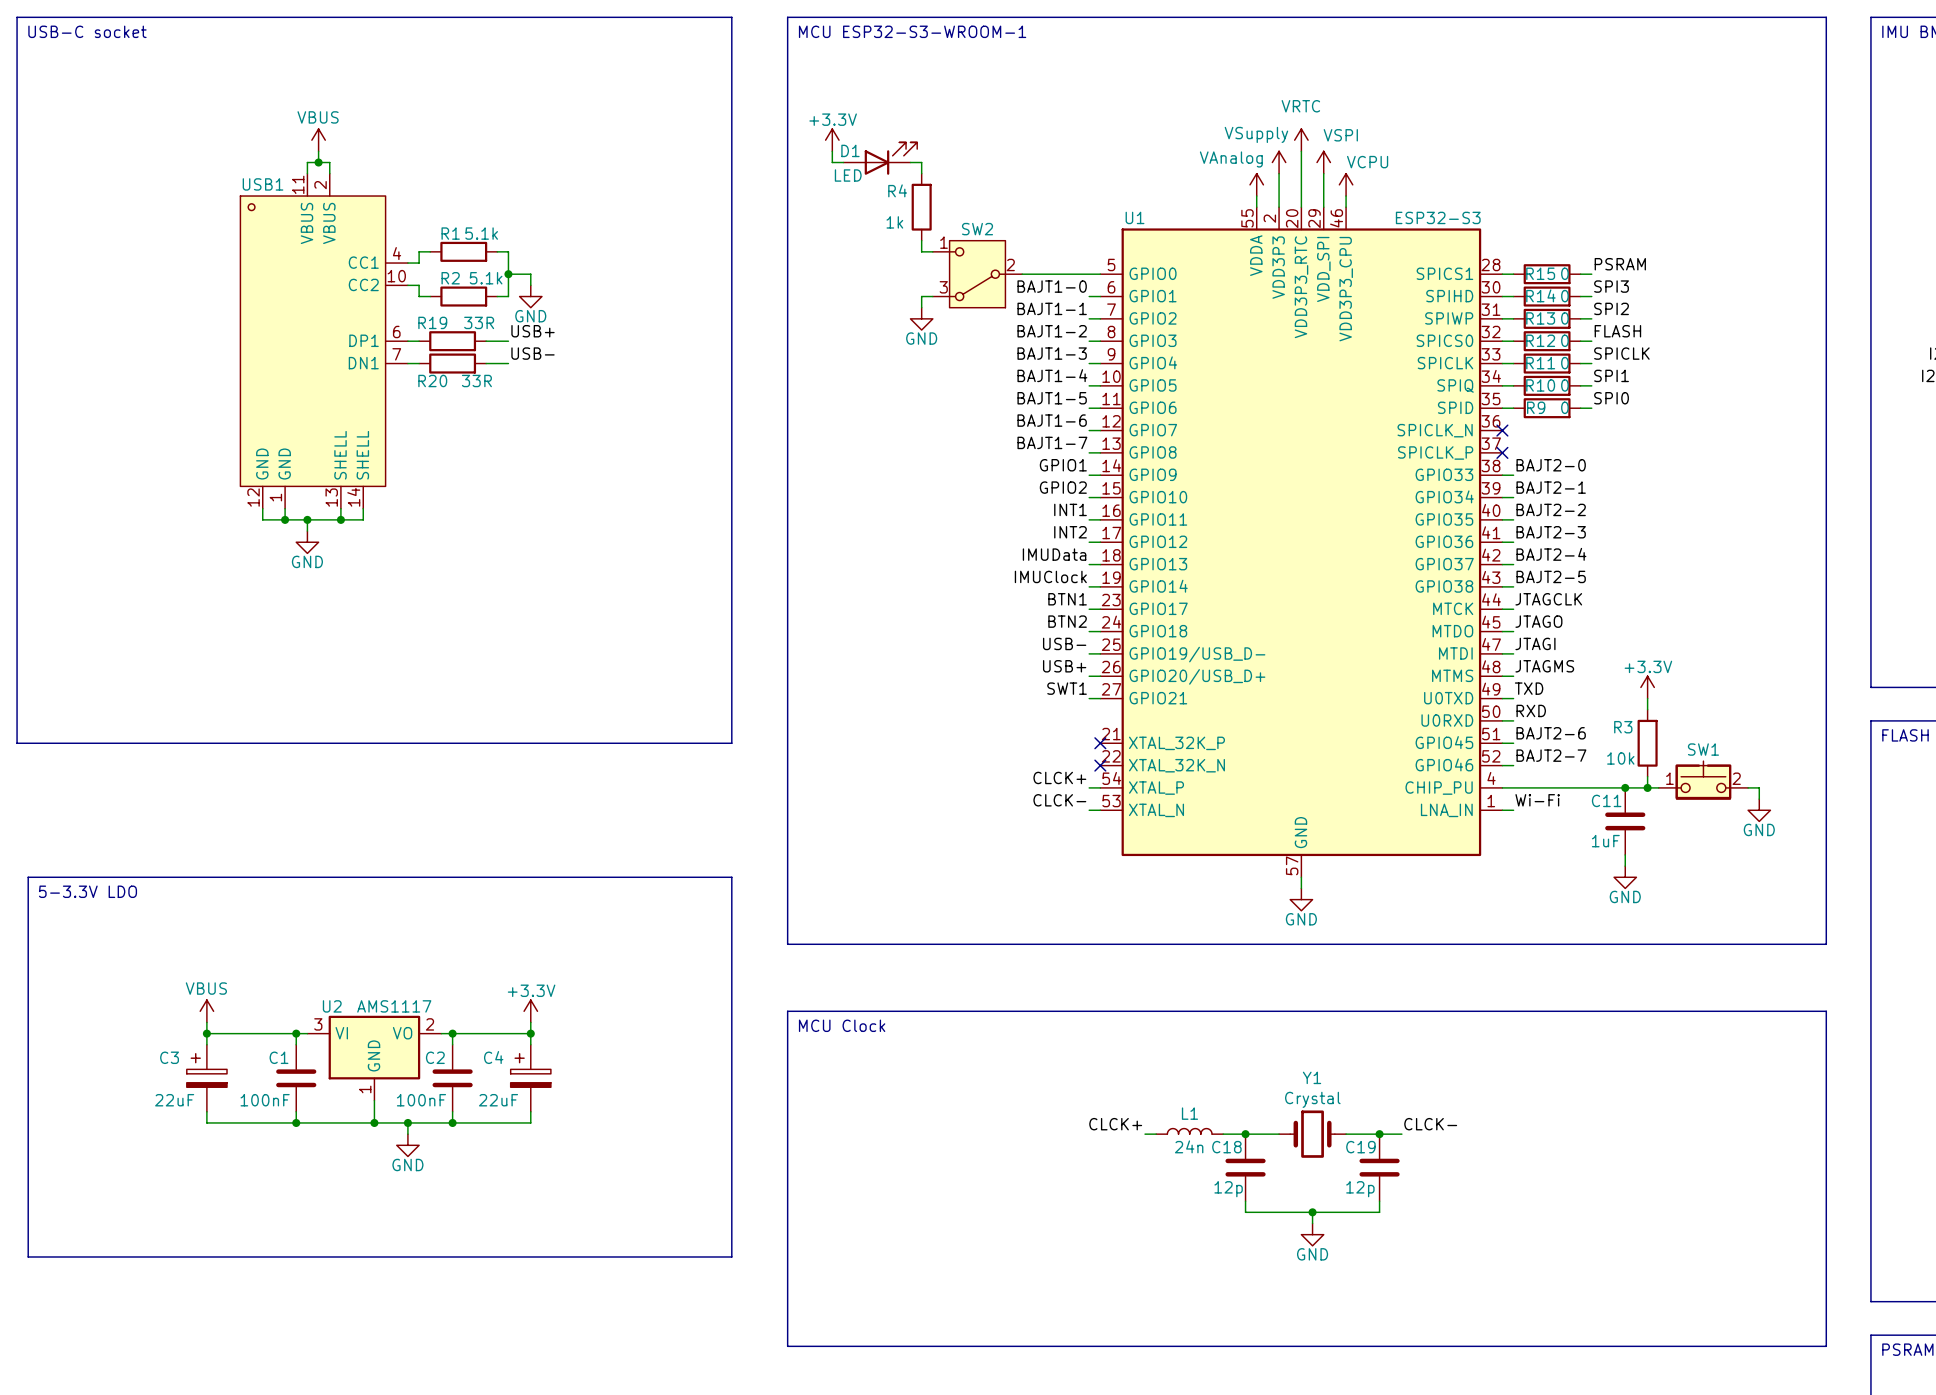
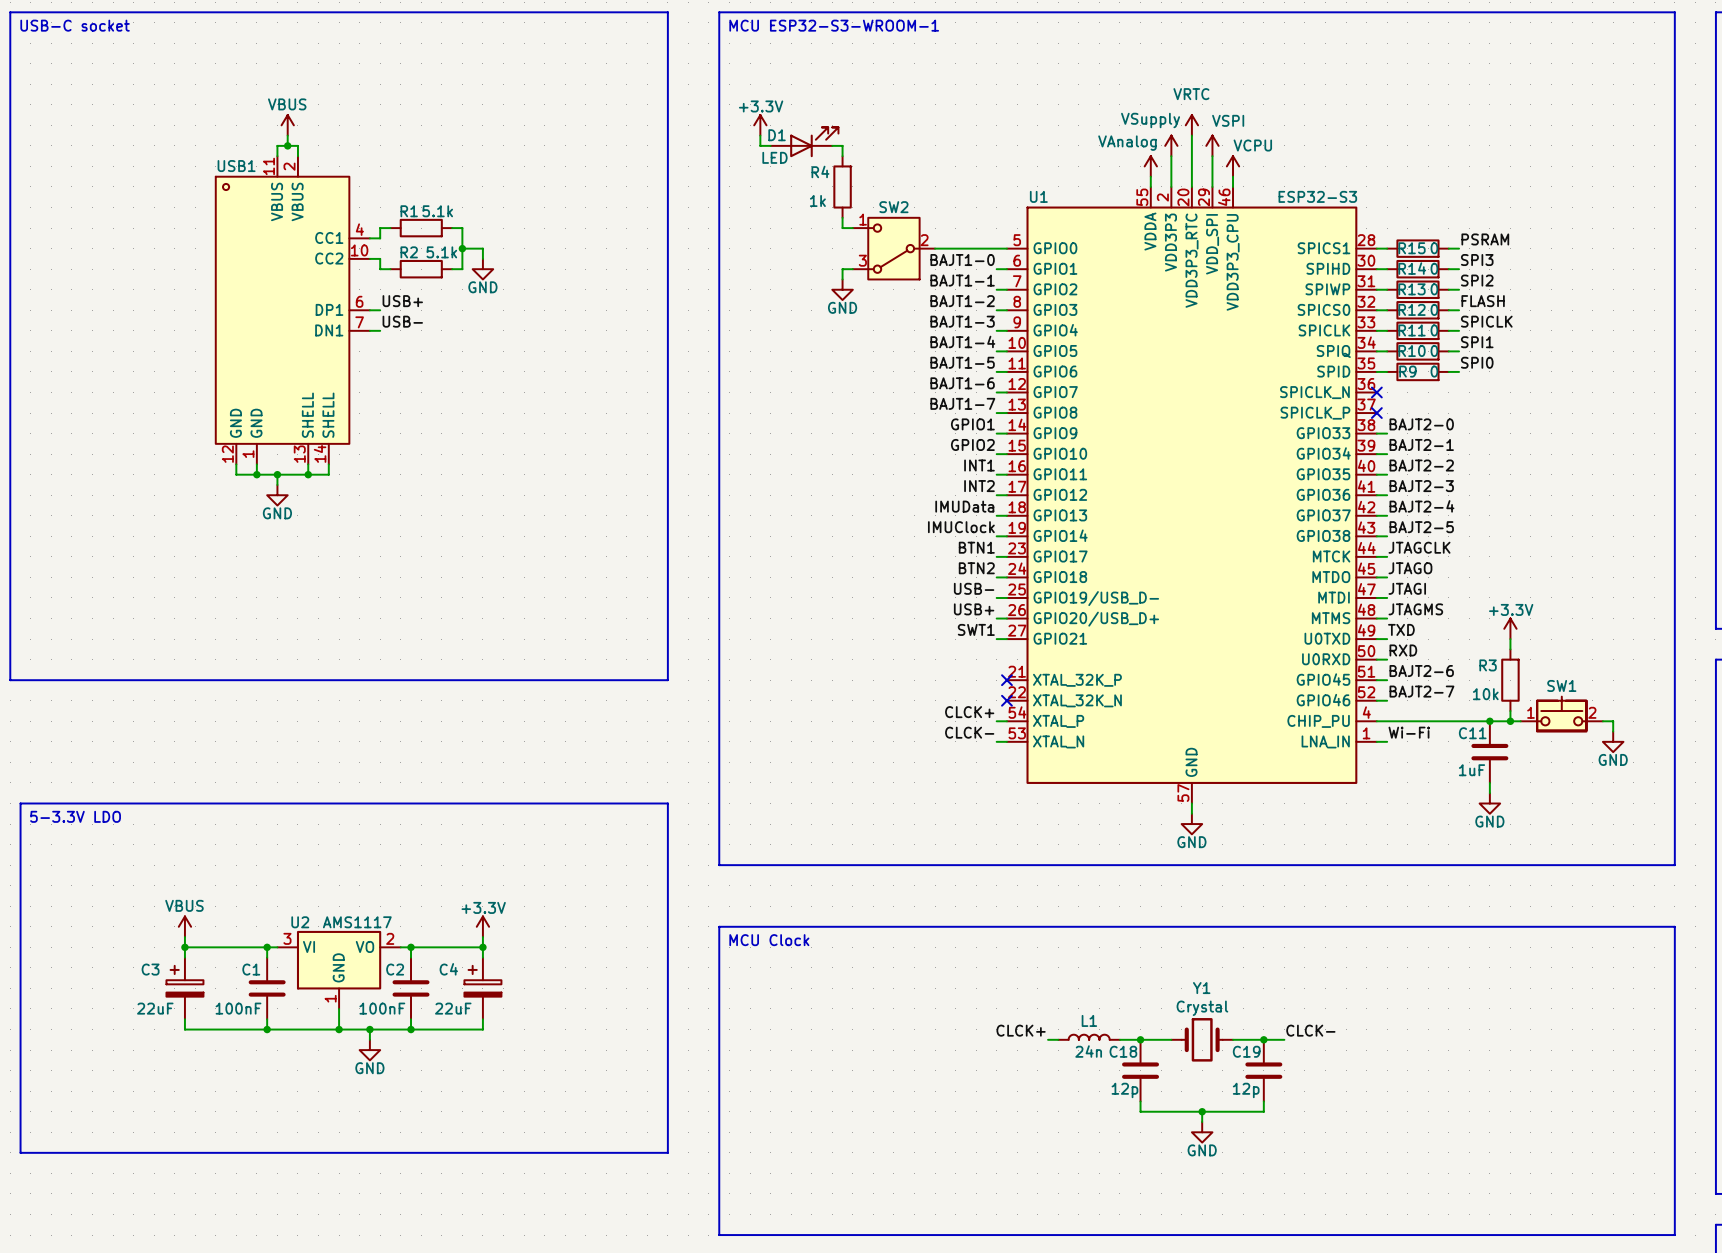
label position: USB+ (532, 331) -> USB+ (402, 301)
R19: 33R (452, 341) -> none
wire: (486, 341) (508, 341) -> none
label position: USB- (532, 353) -> USB- (402, 321)
R20: 33R (452, 363) -> none
wire: (486, 363) (508, 363) -> none

